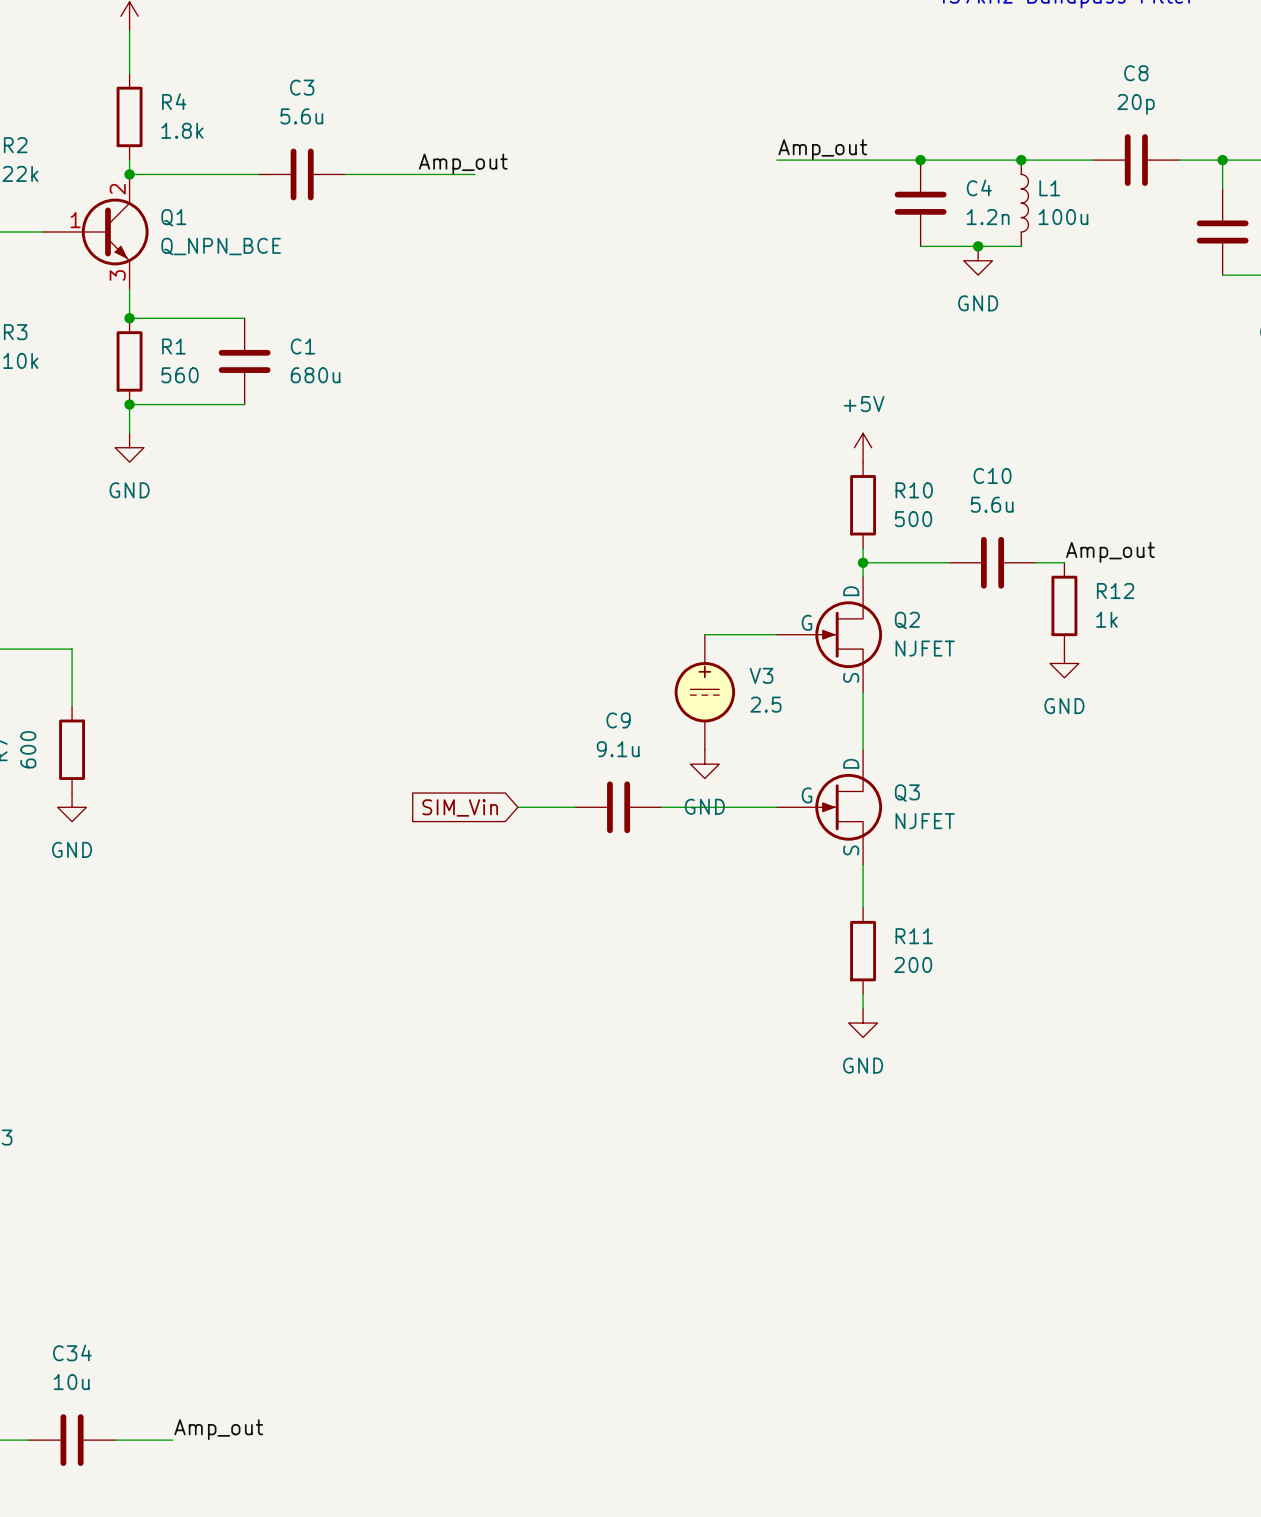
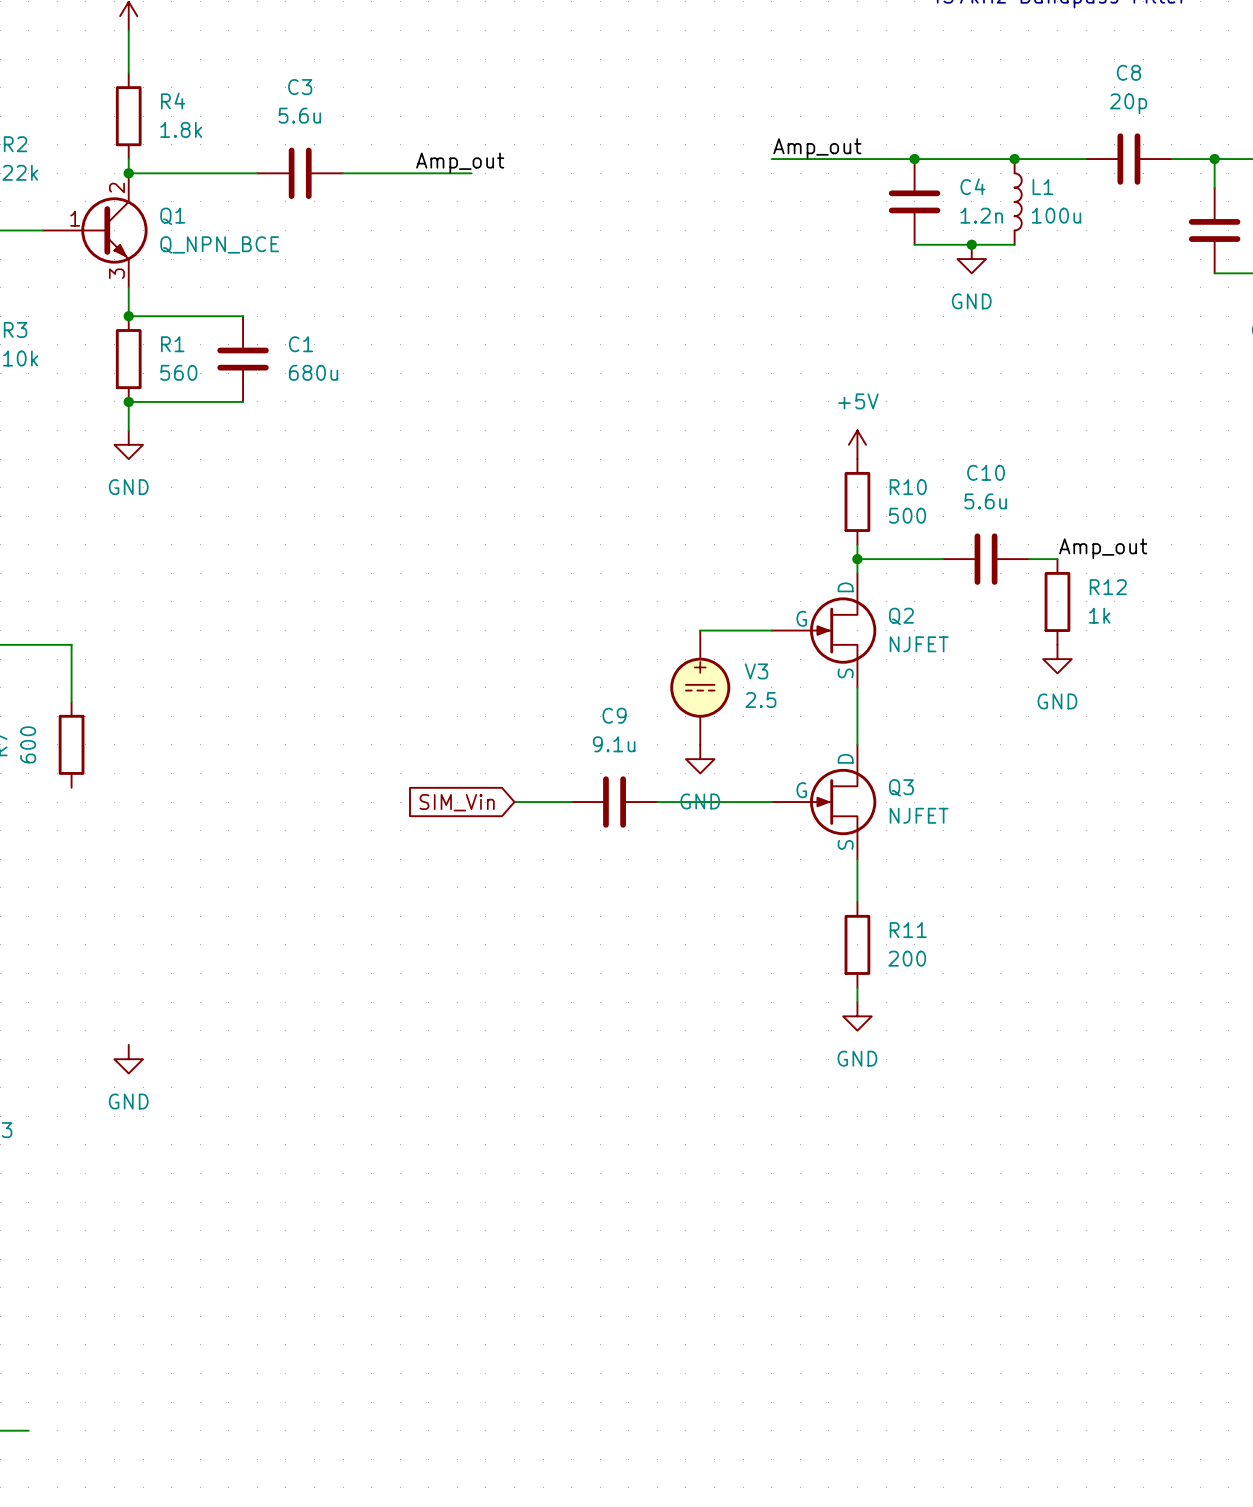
power symbol: GND (72, 807) -> none
power symbol: none -> GND (128, 1059)
label: Amp_out (218, 1429) -> none
C34: 10u (72, 1440) -> none
wire: (115, 1440) (172, 1440) -> none

